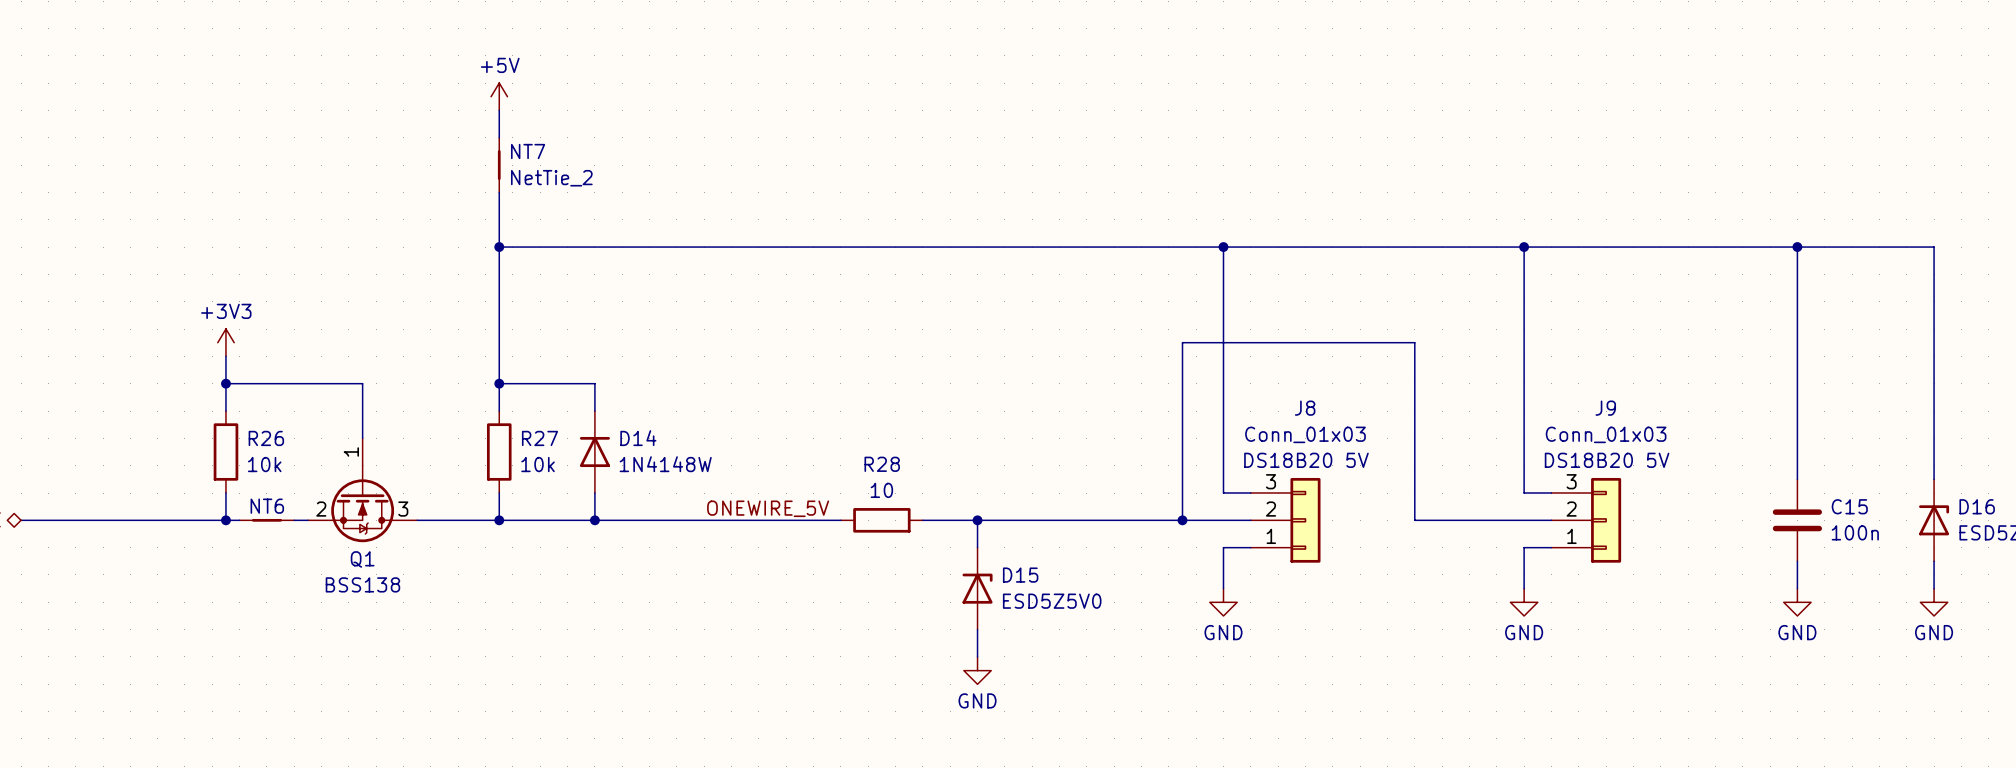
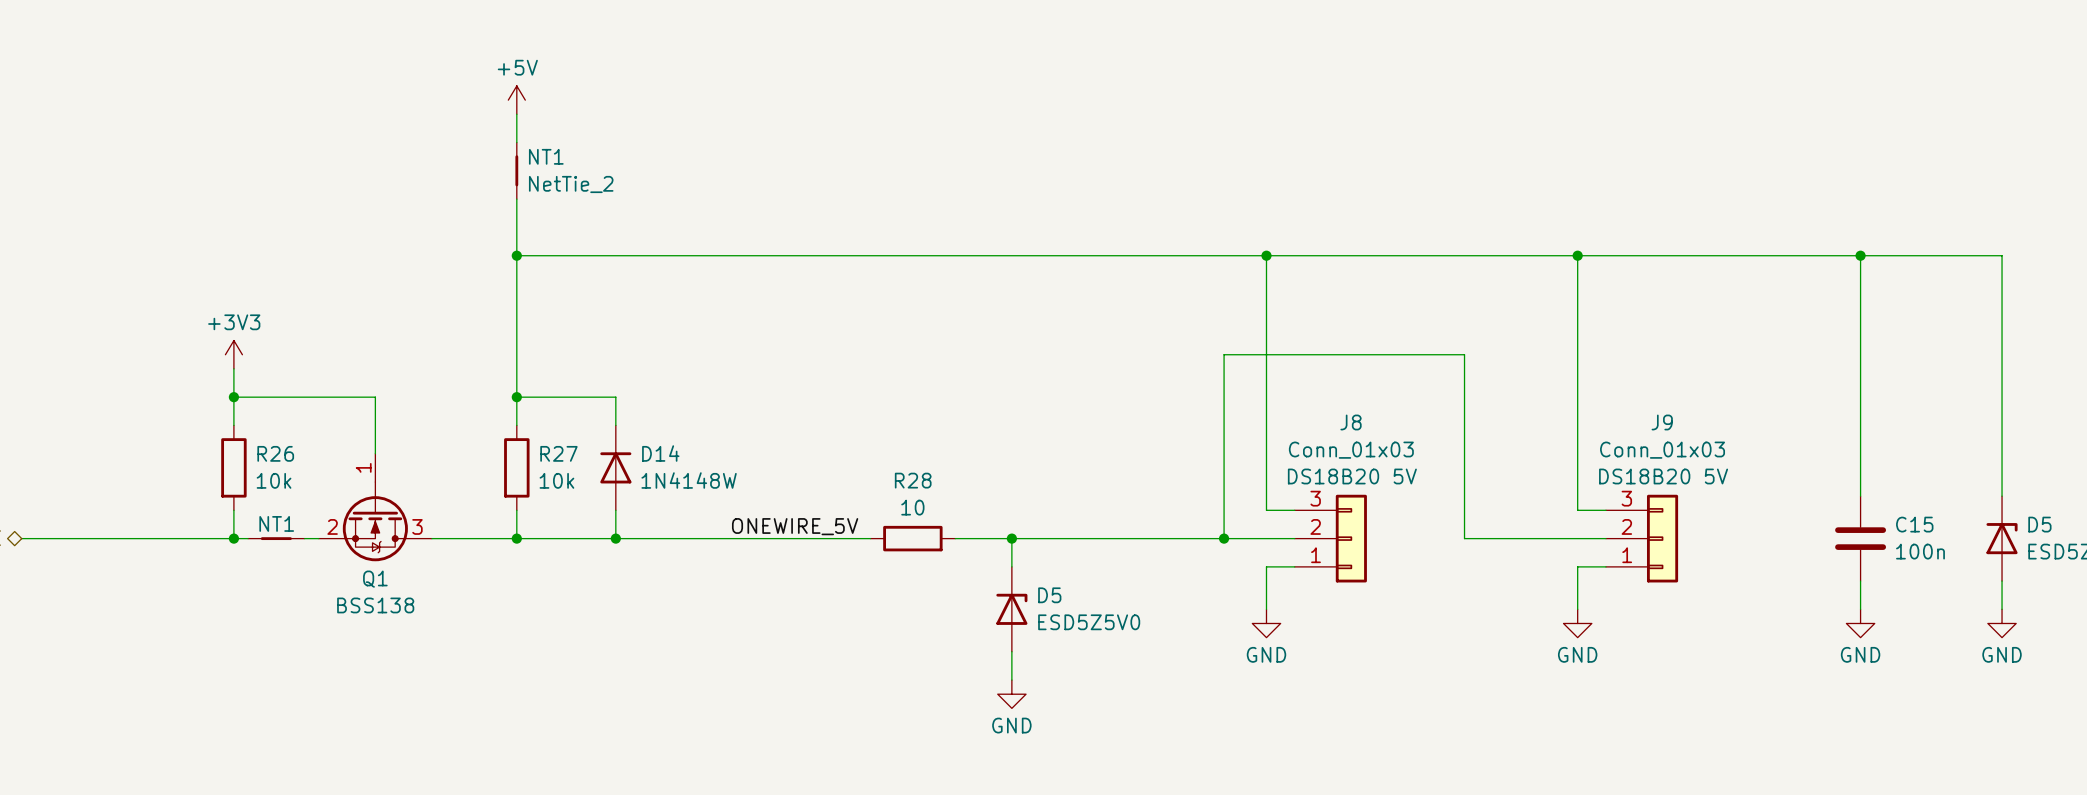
NT7 name: NT7 (528, 151) -> NT1 (546, 156)
NT6 name: NT6 (267, 506) -> NT1 (276, 523)
D16 name: D16 (1977, 506) -> D5 (2039, 524)
D15 name: D15 (1020, 575) -> D5 (1049, 595)

